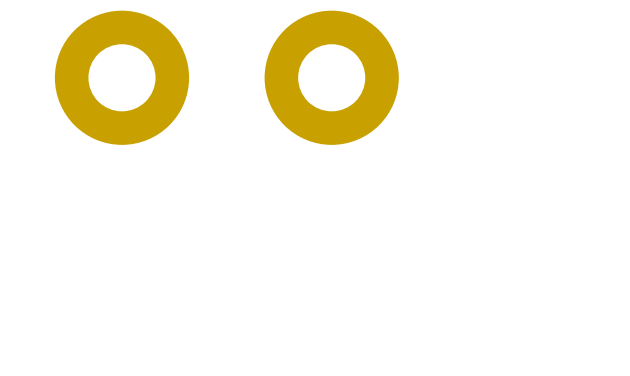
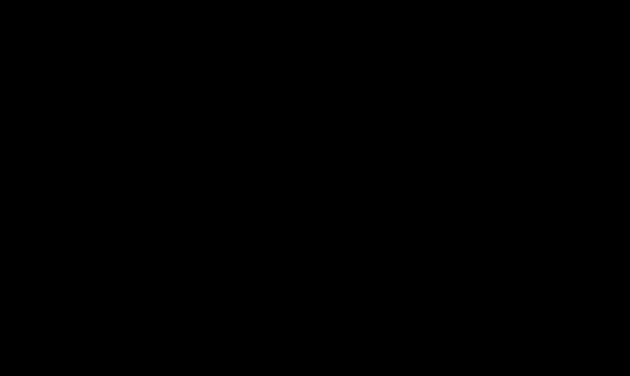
part: (226, 77) -> none

